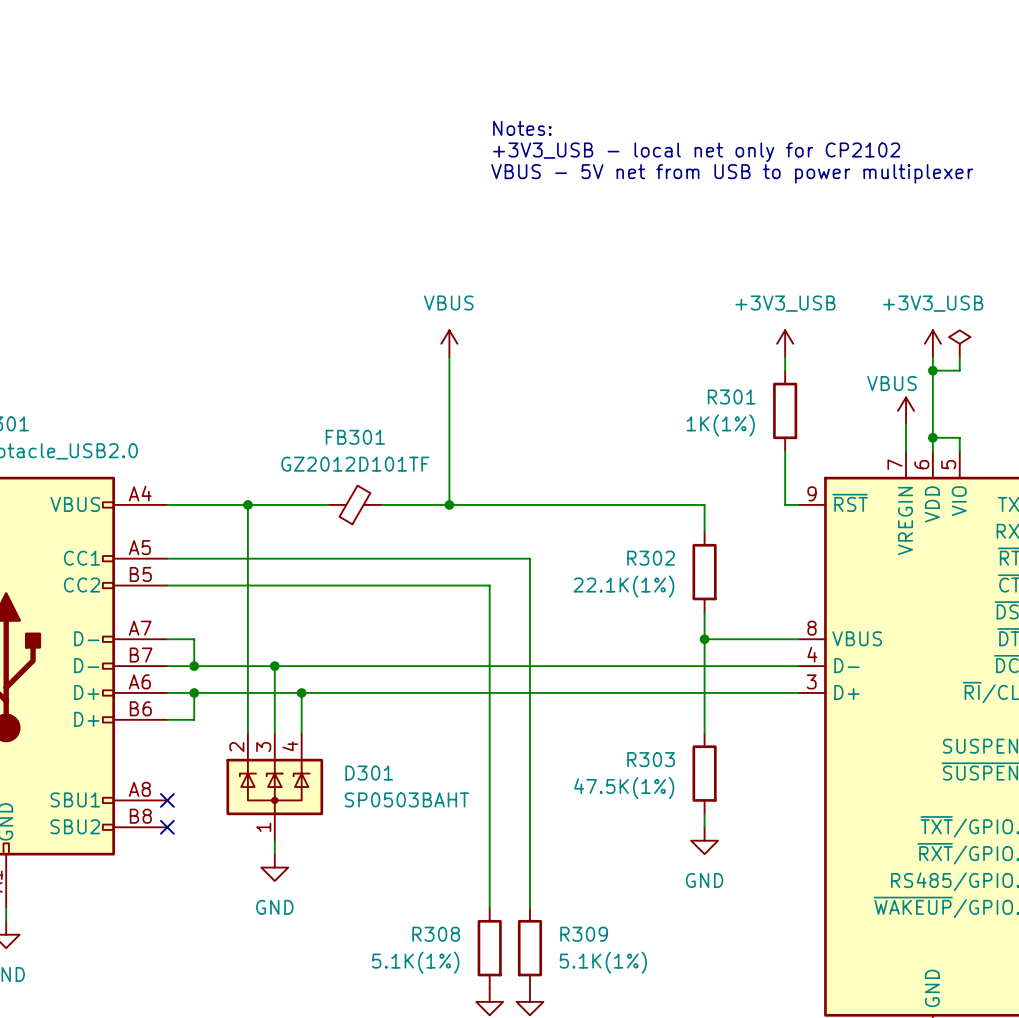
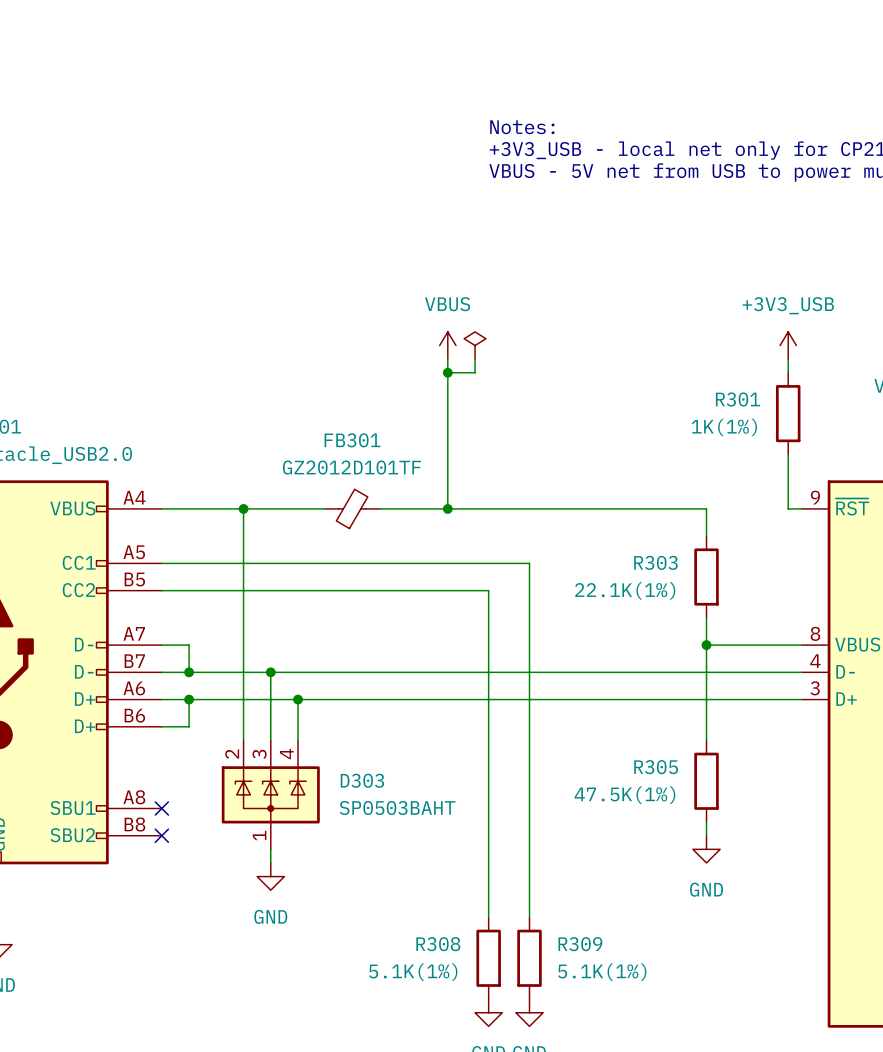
power symbol: none -> (475, 345)
wire: none -> (475, 359) (475, 372) (447, 372)
junction: none -> (447, 372)
R302 name: R302 (651, 558) -> R303 (655, 562)
R303 name: R303 (651, 759) -> R305 (656, 767)
D301 name: D301 (369, 773) -> D303 (362, 780)

